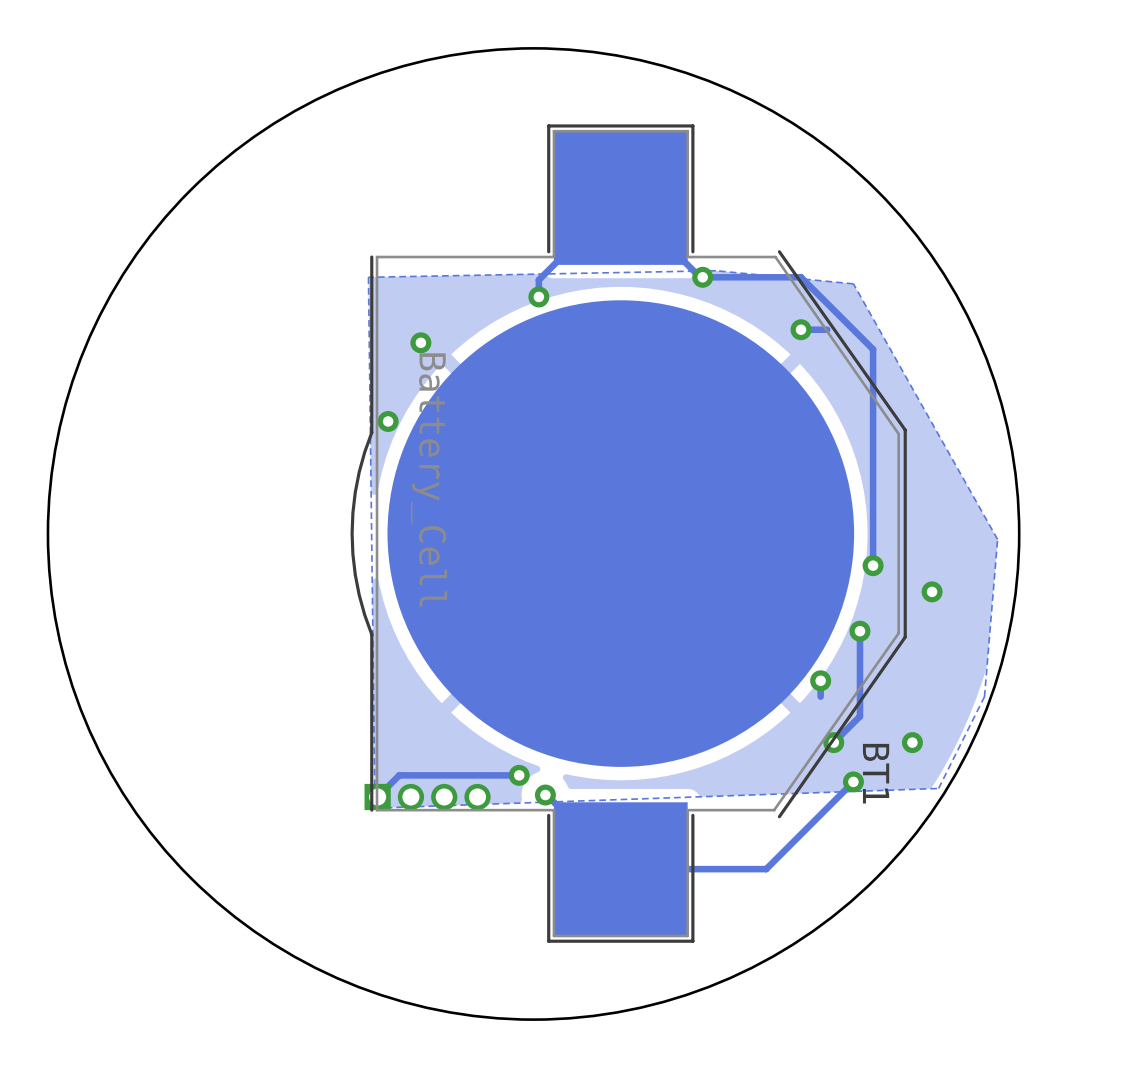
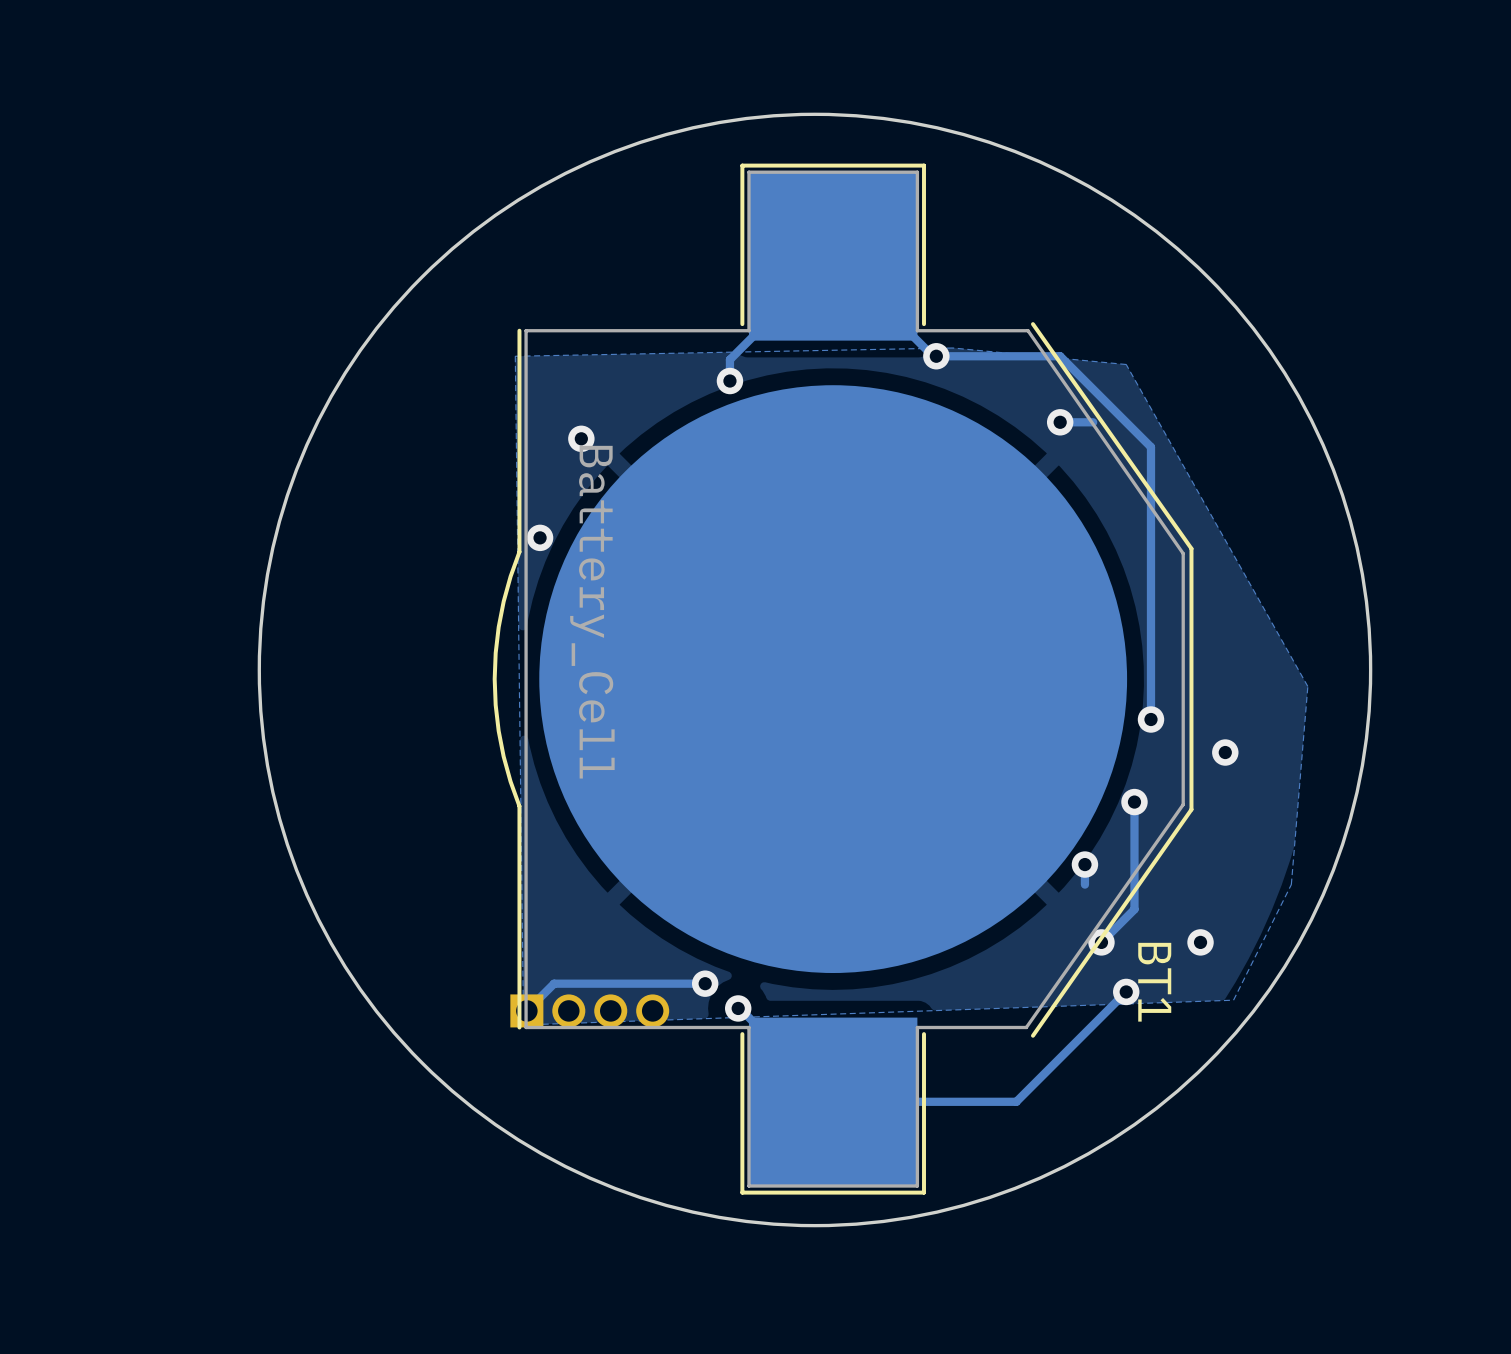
round board edge: [46, 47, 1021, 1021] -> none
round board edge: none -> [257, 112, 1373, 1228]

